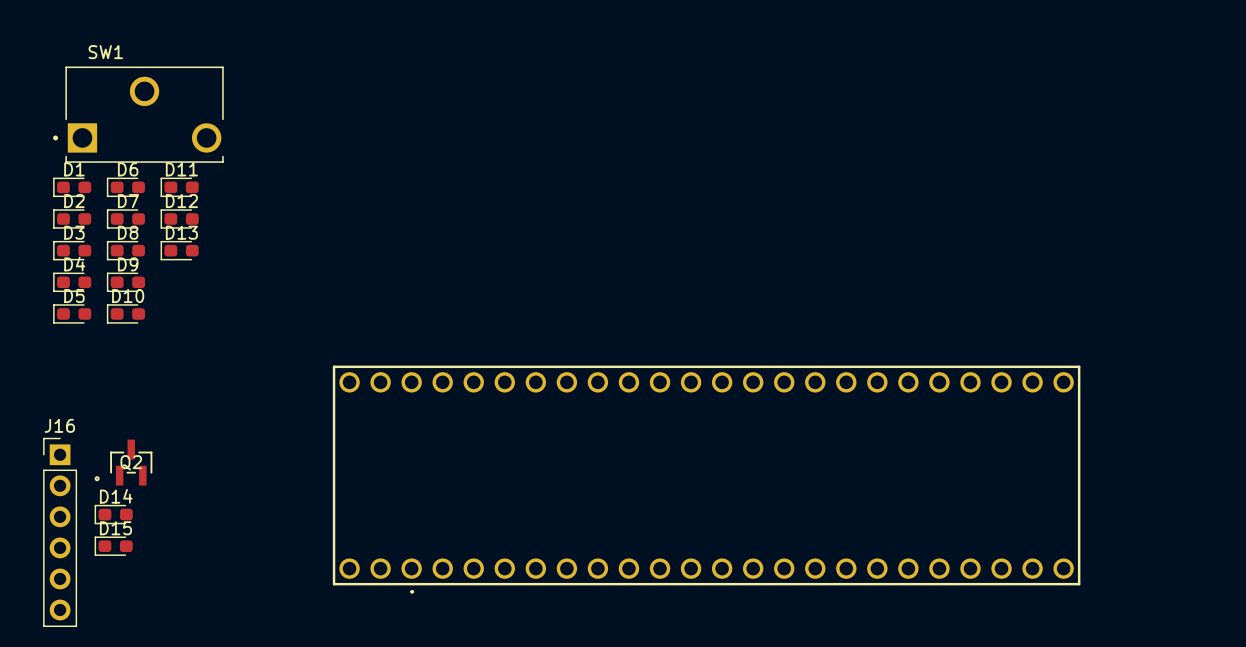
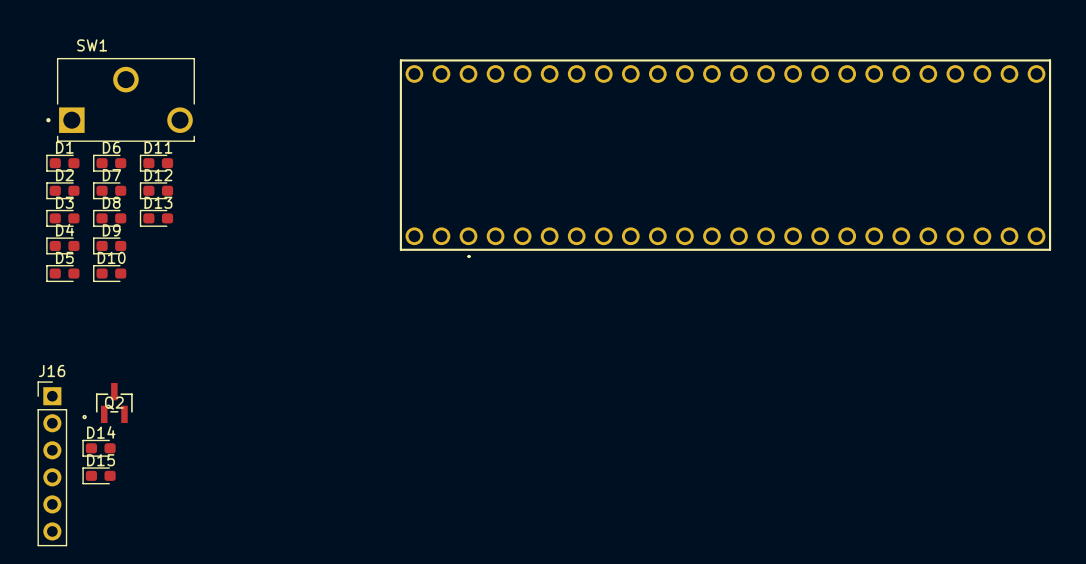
part: none -> (725, 158)
part: (706, 479) -> none

